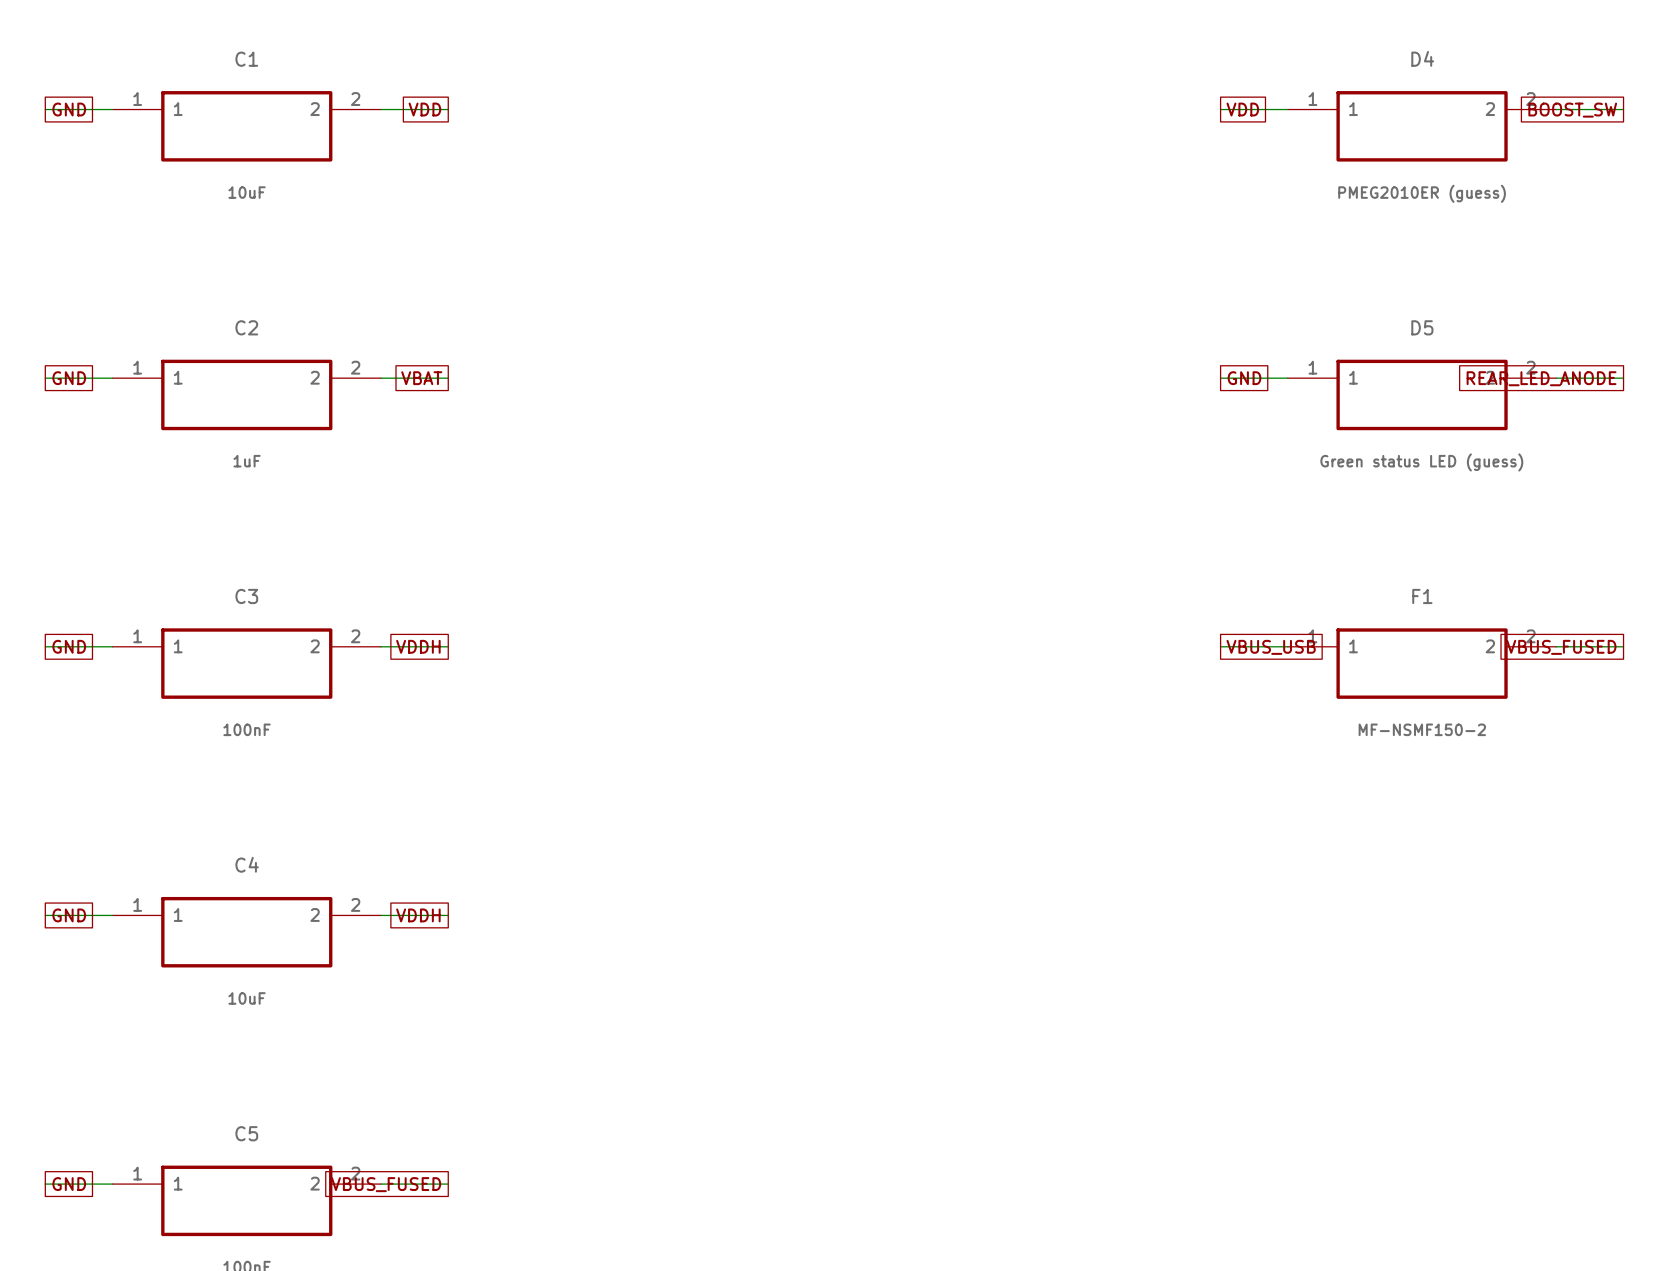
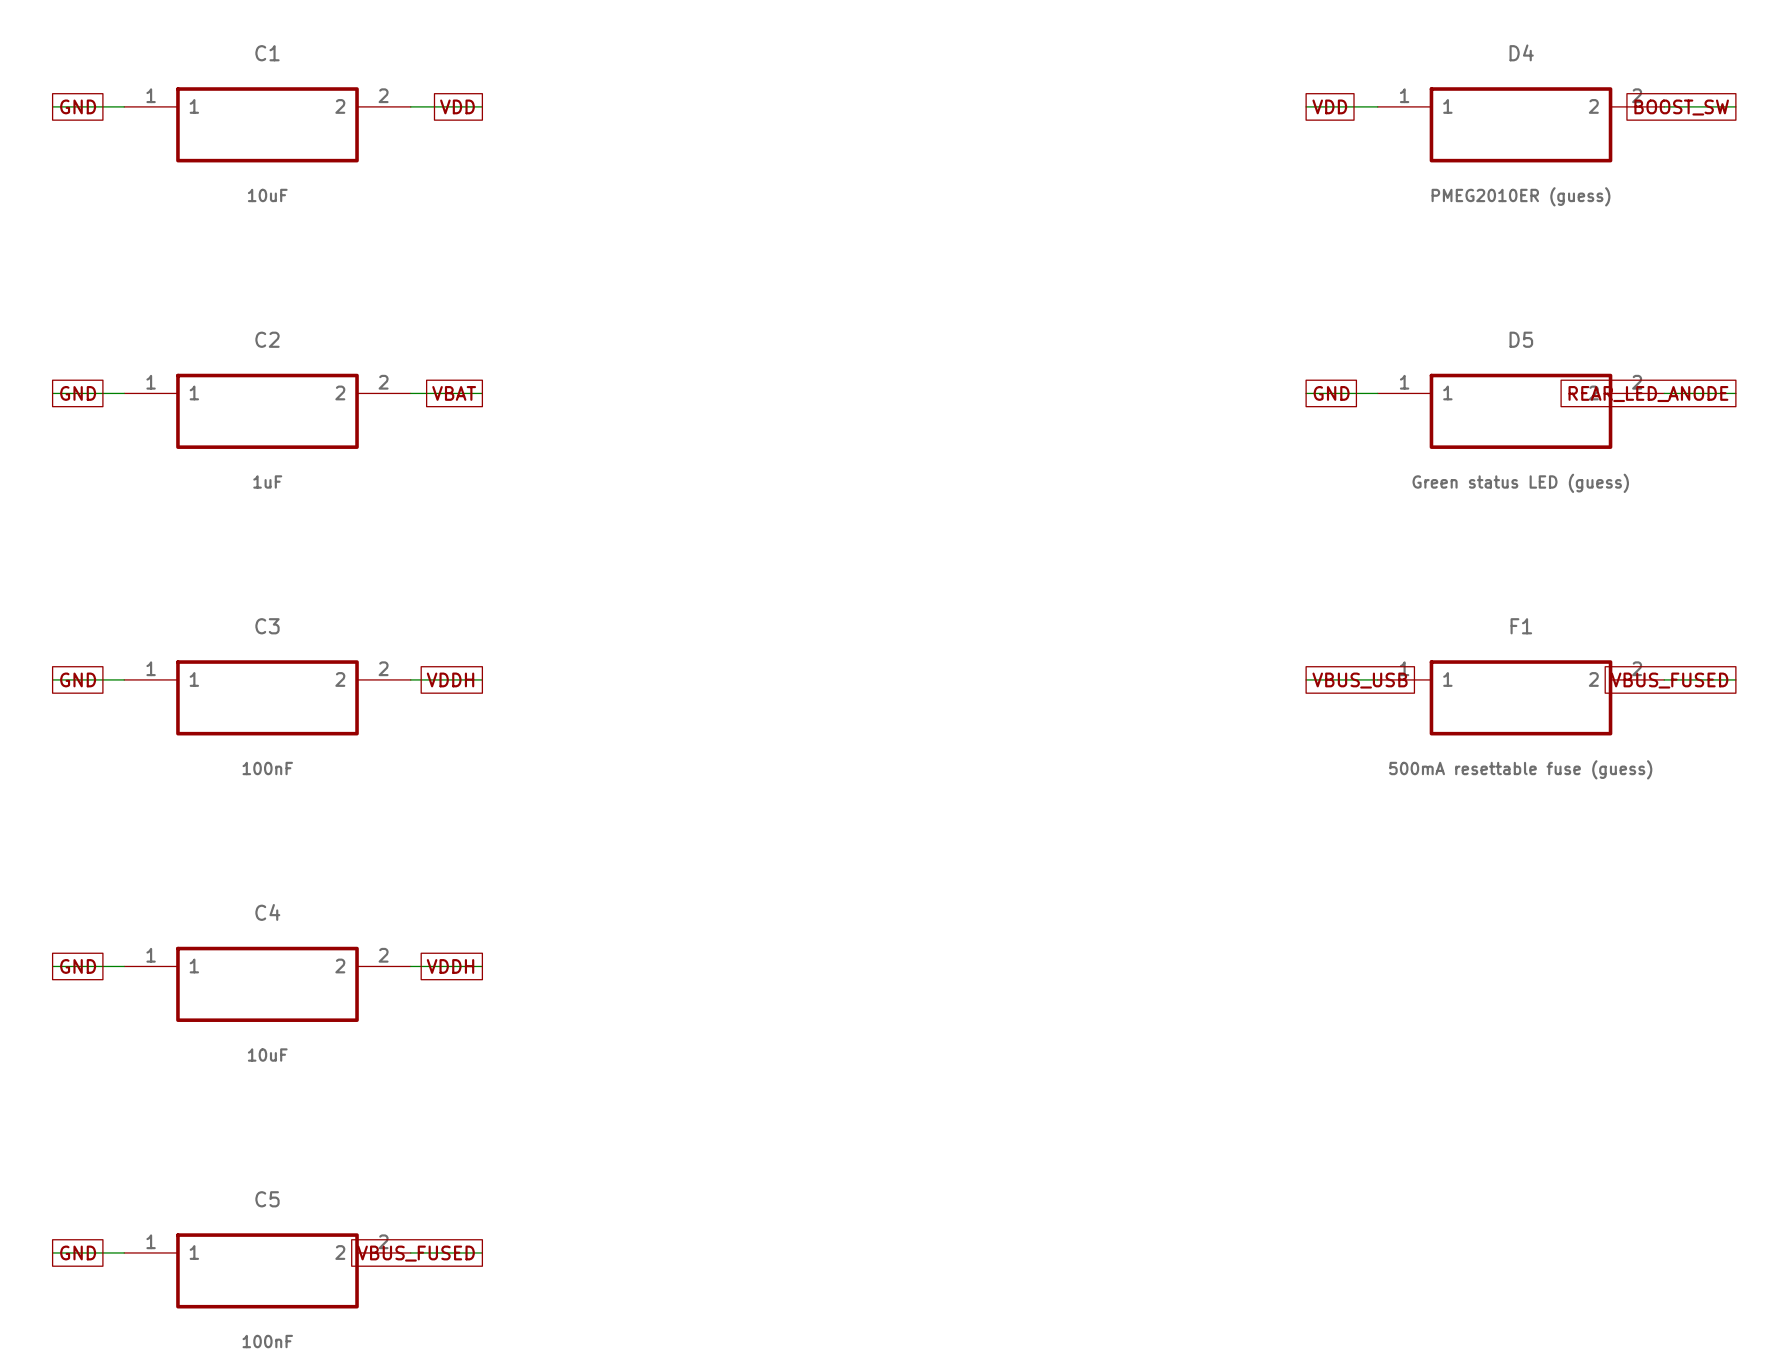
F1 value: MF-NSMF150-2 (1422, 729) -> 500mA resettable fuse (guess) (1520, 769)

